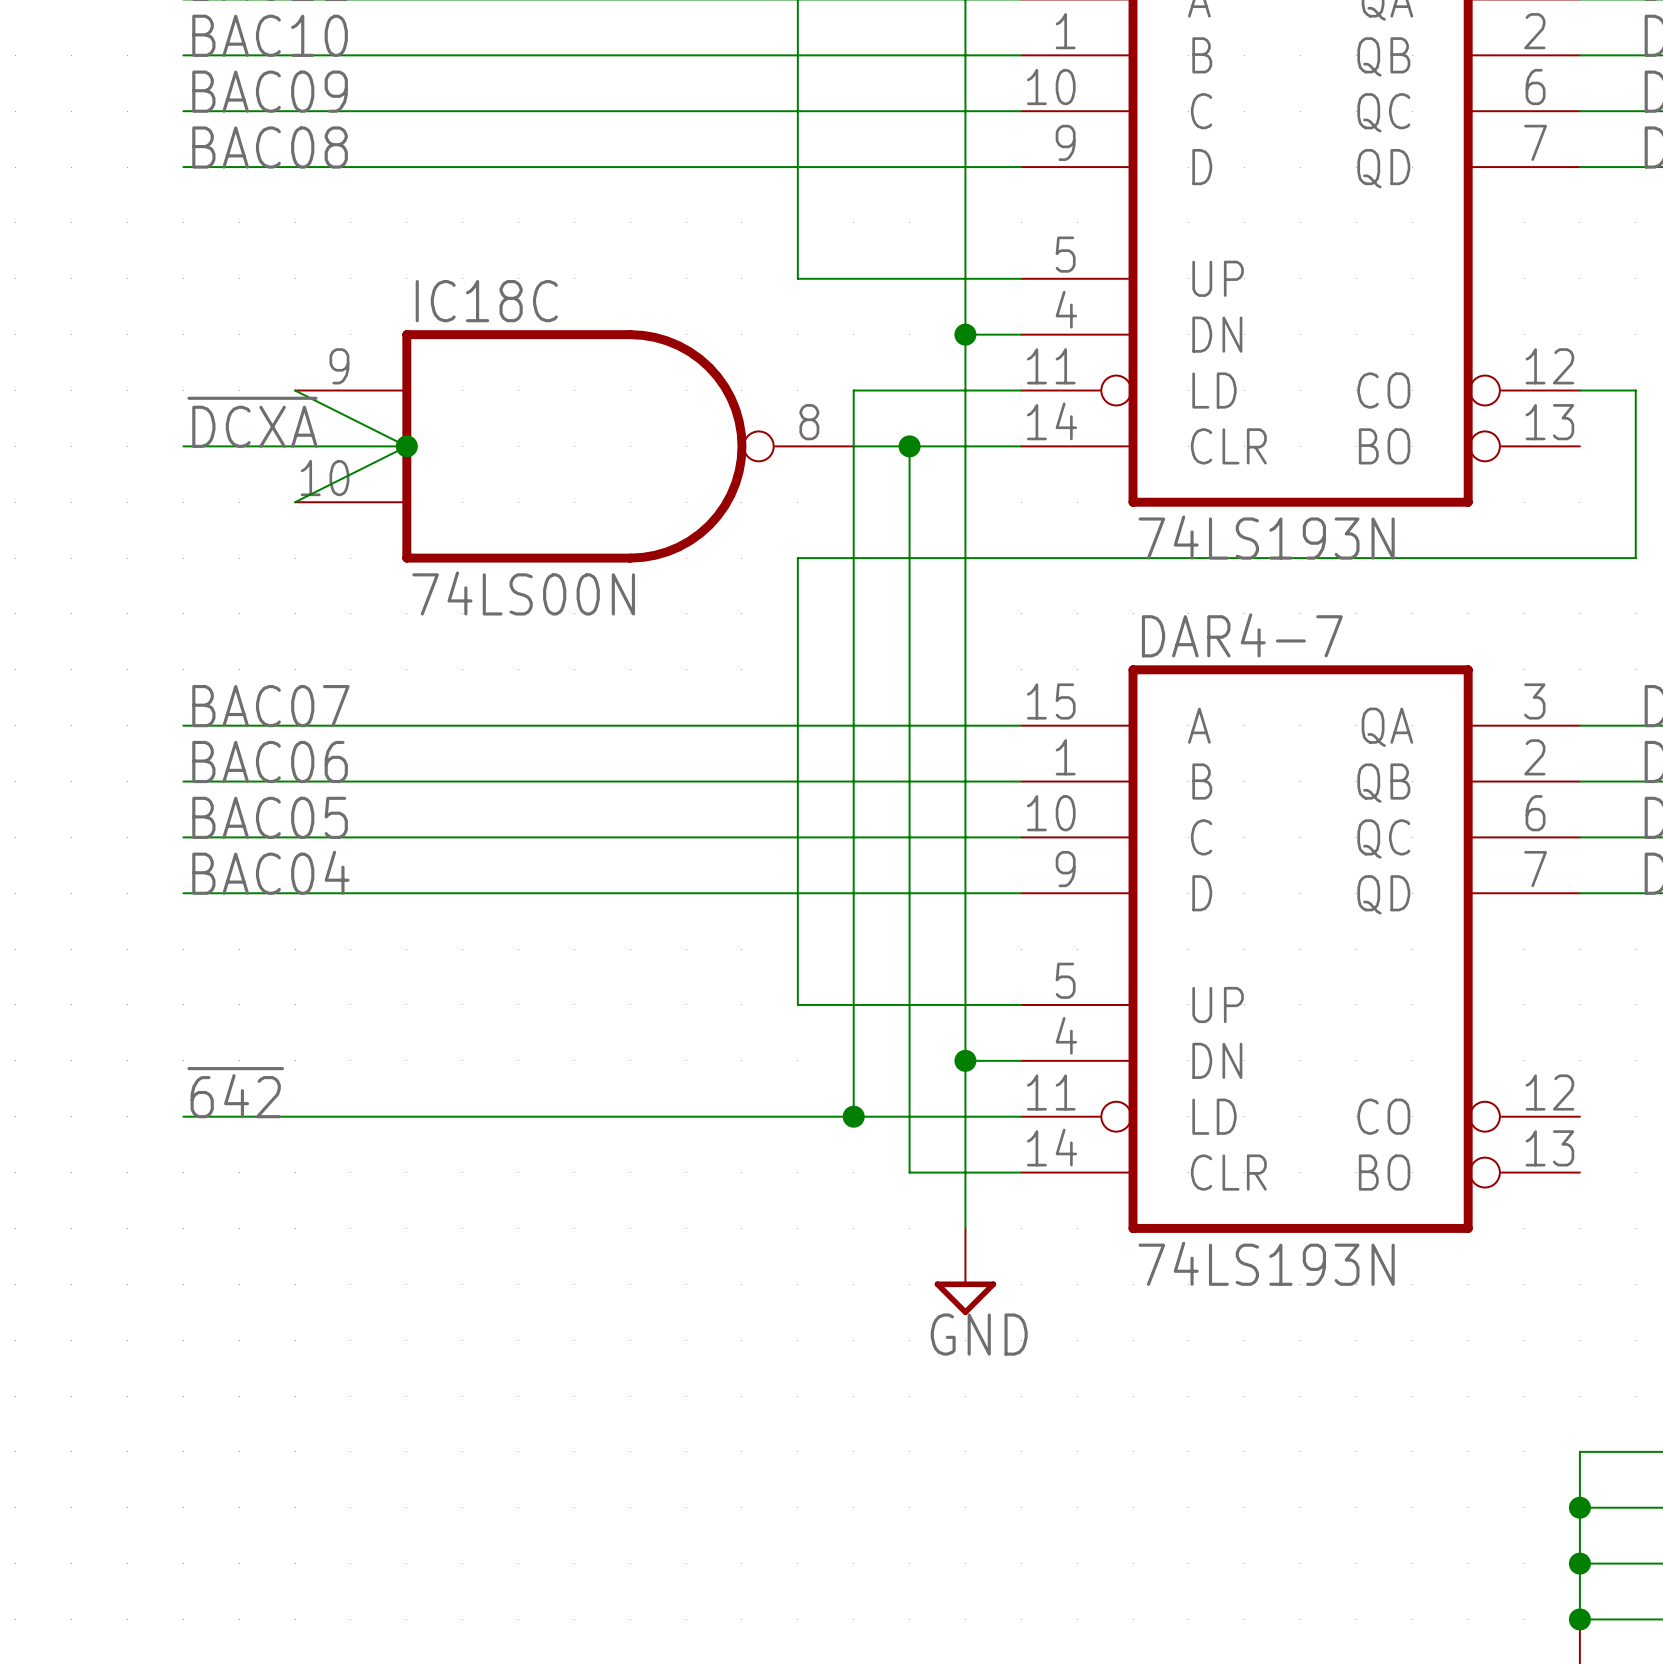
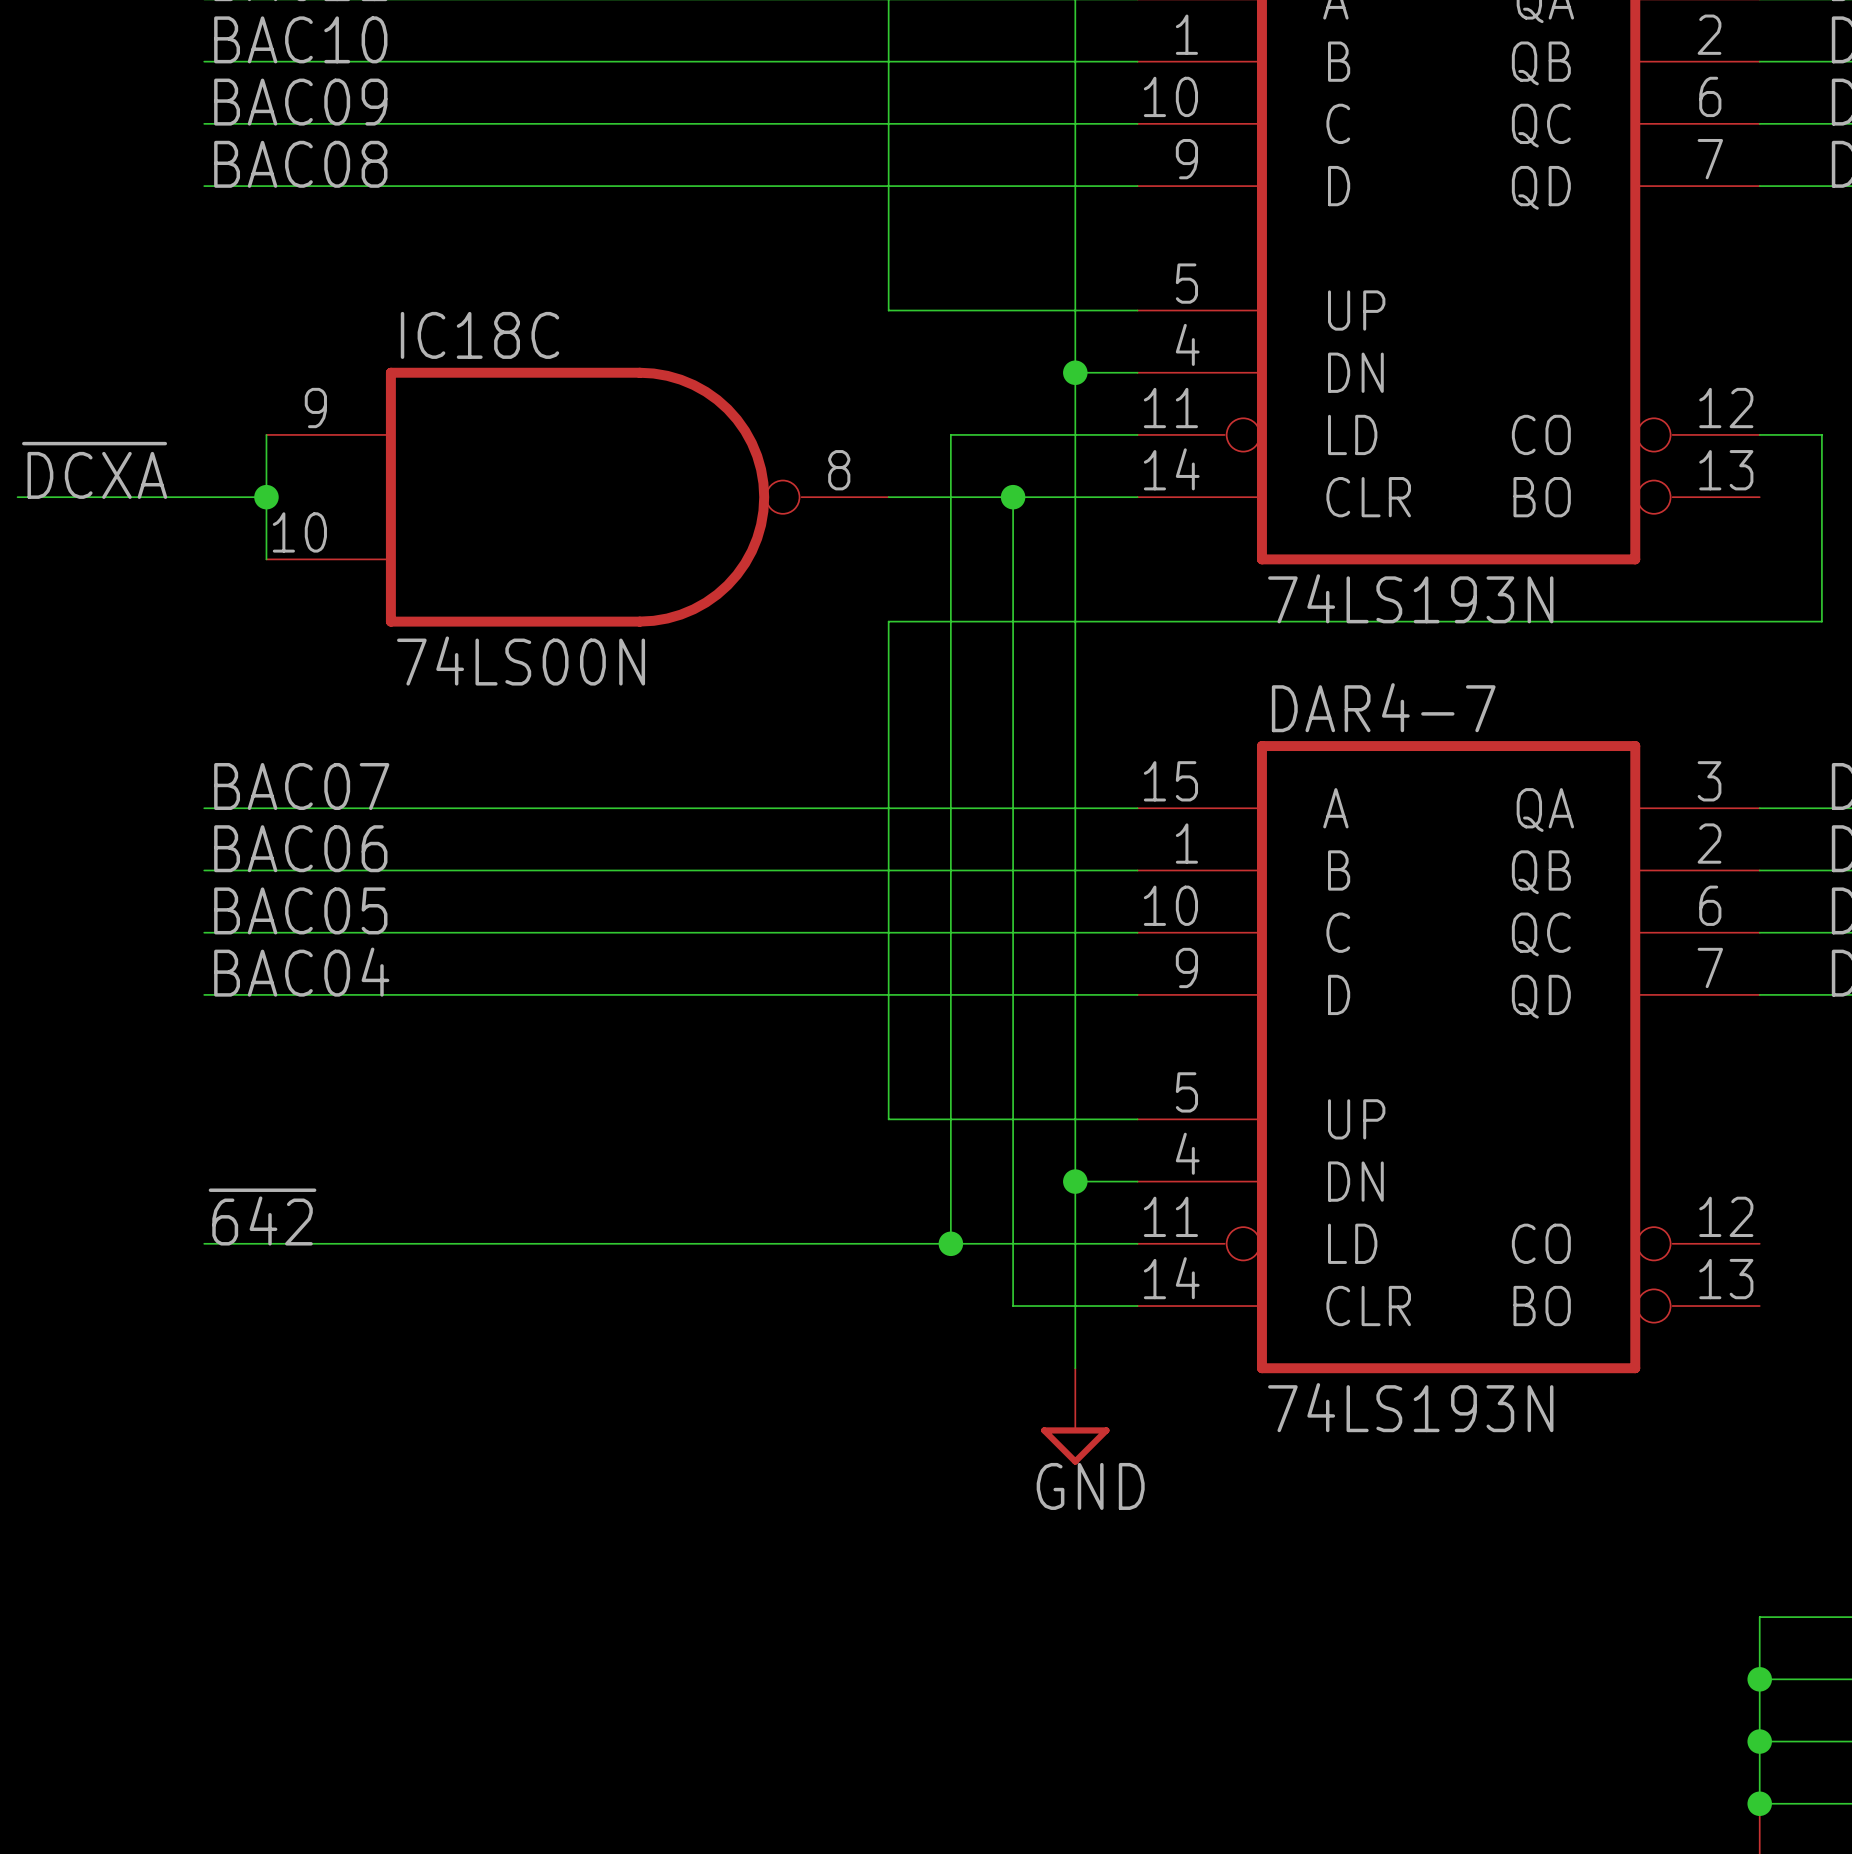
wire: none -> (266, 434) (266, 559)
wire: (295, 390) (406, 446) -> none
label position: ~{DCXA} (252, 422) -> ~{DCXA} (94, 470)
wire: (239, 446) (406, 446) -> (17, 497) (204, 497)
junction: none -> (266, 497)
wire: (406, 446) (295, 502) -> none
junction: (406, 446) -> none
IC18C position: (574, 446) -> (577, 497)

